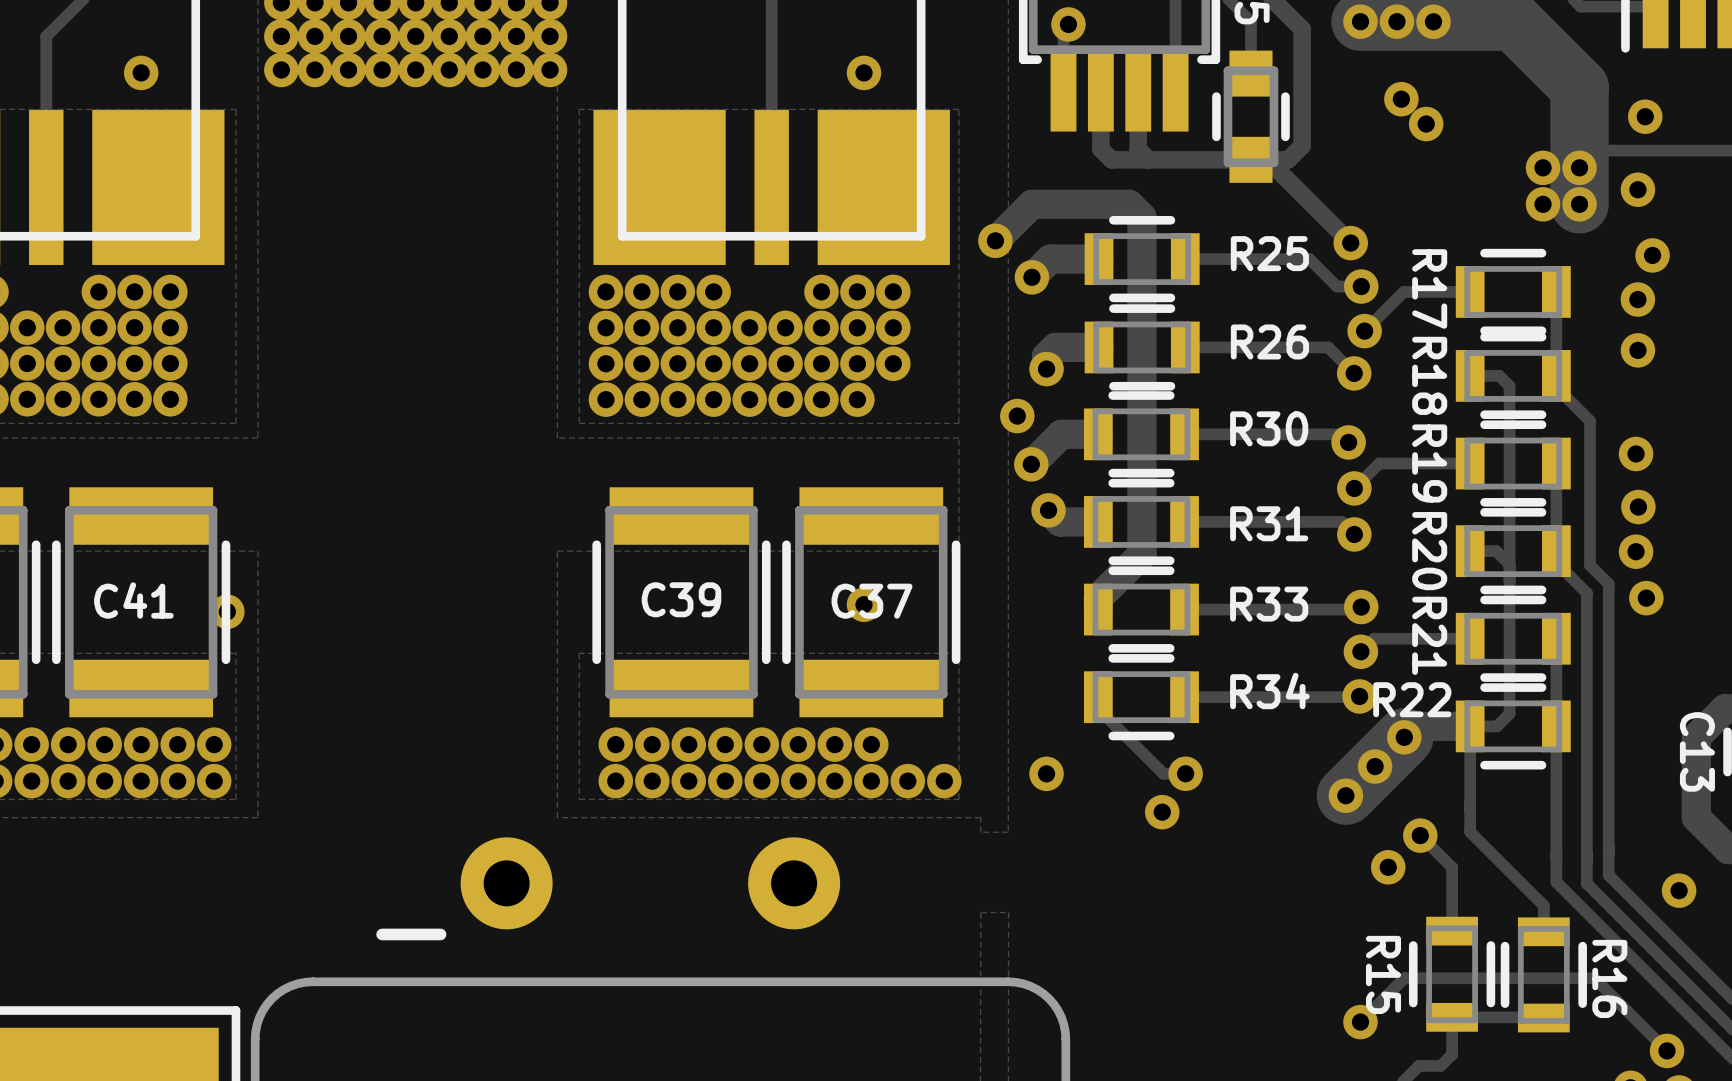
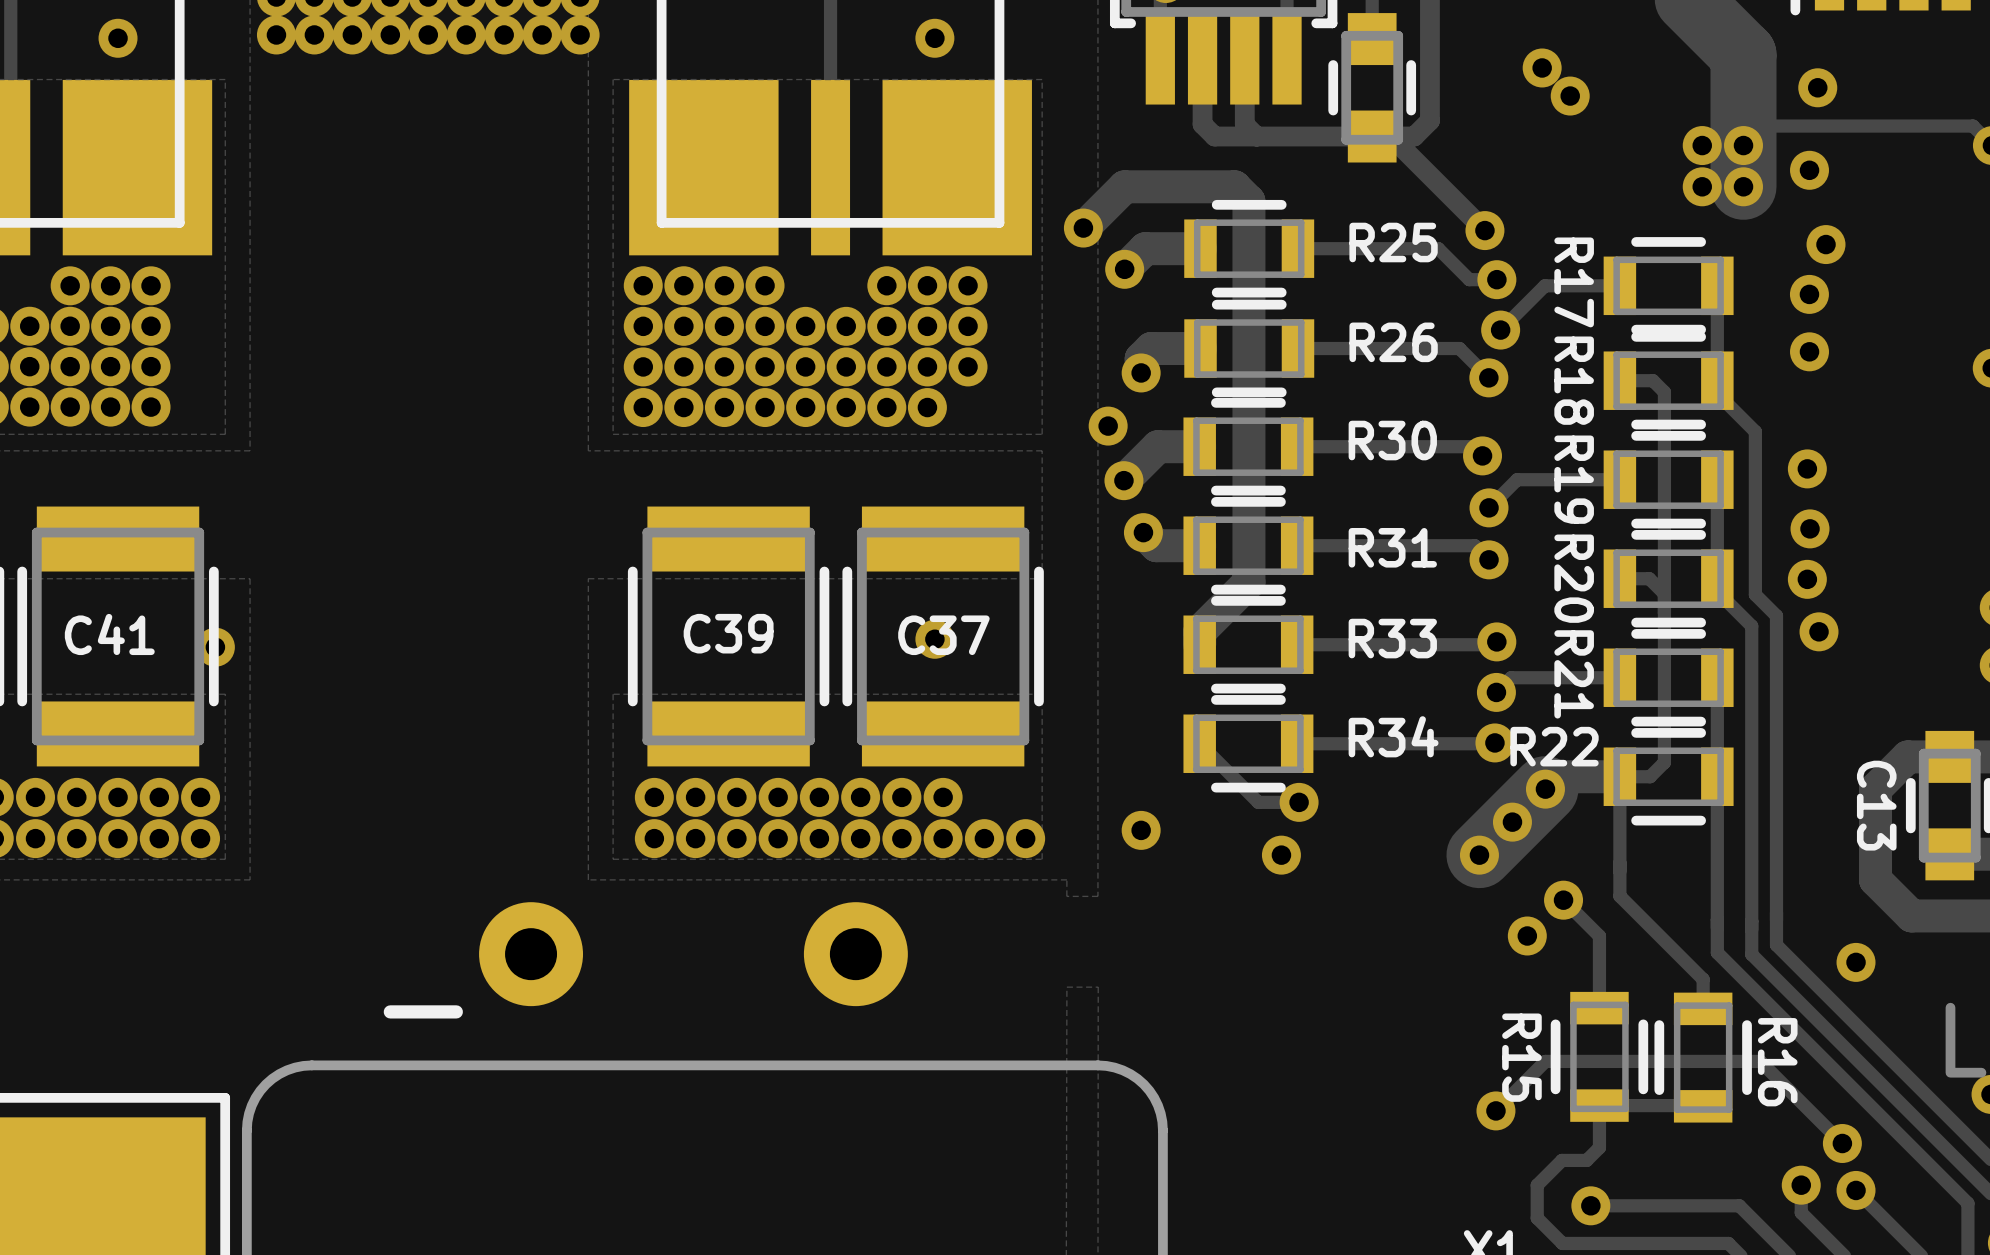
track: none -> (1199, 743) (1258, 802) (1299, 802)
track: (1098, 708) (1163, 773) (1185, 773) -> none
via: none -> (1299, 802)
via: (1185, 773) -> none
via: none -> (1281, 855)
via: (1162, 812) -> none

